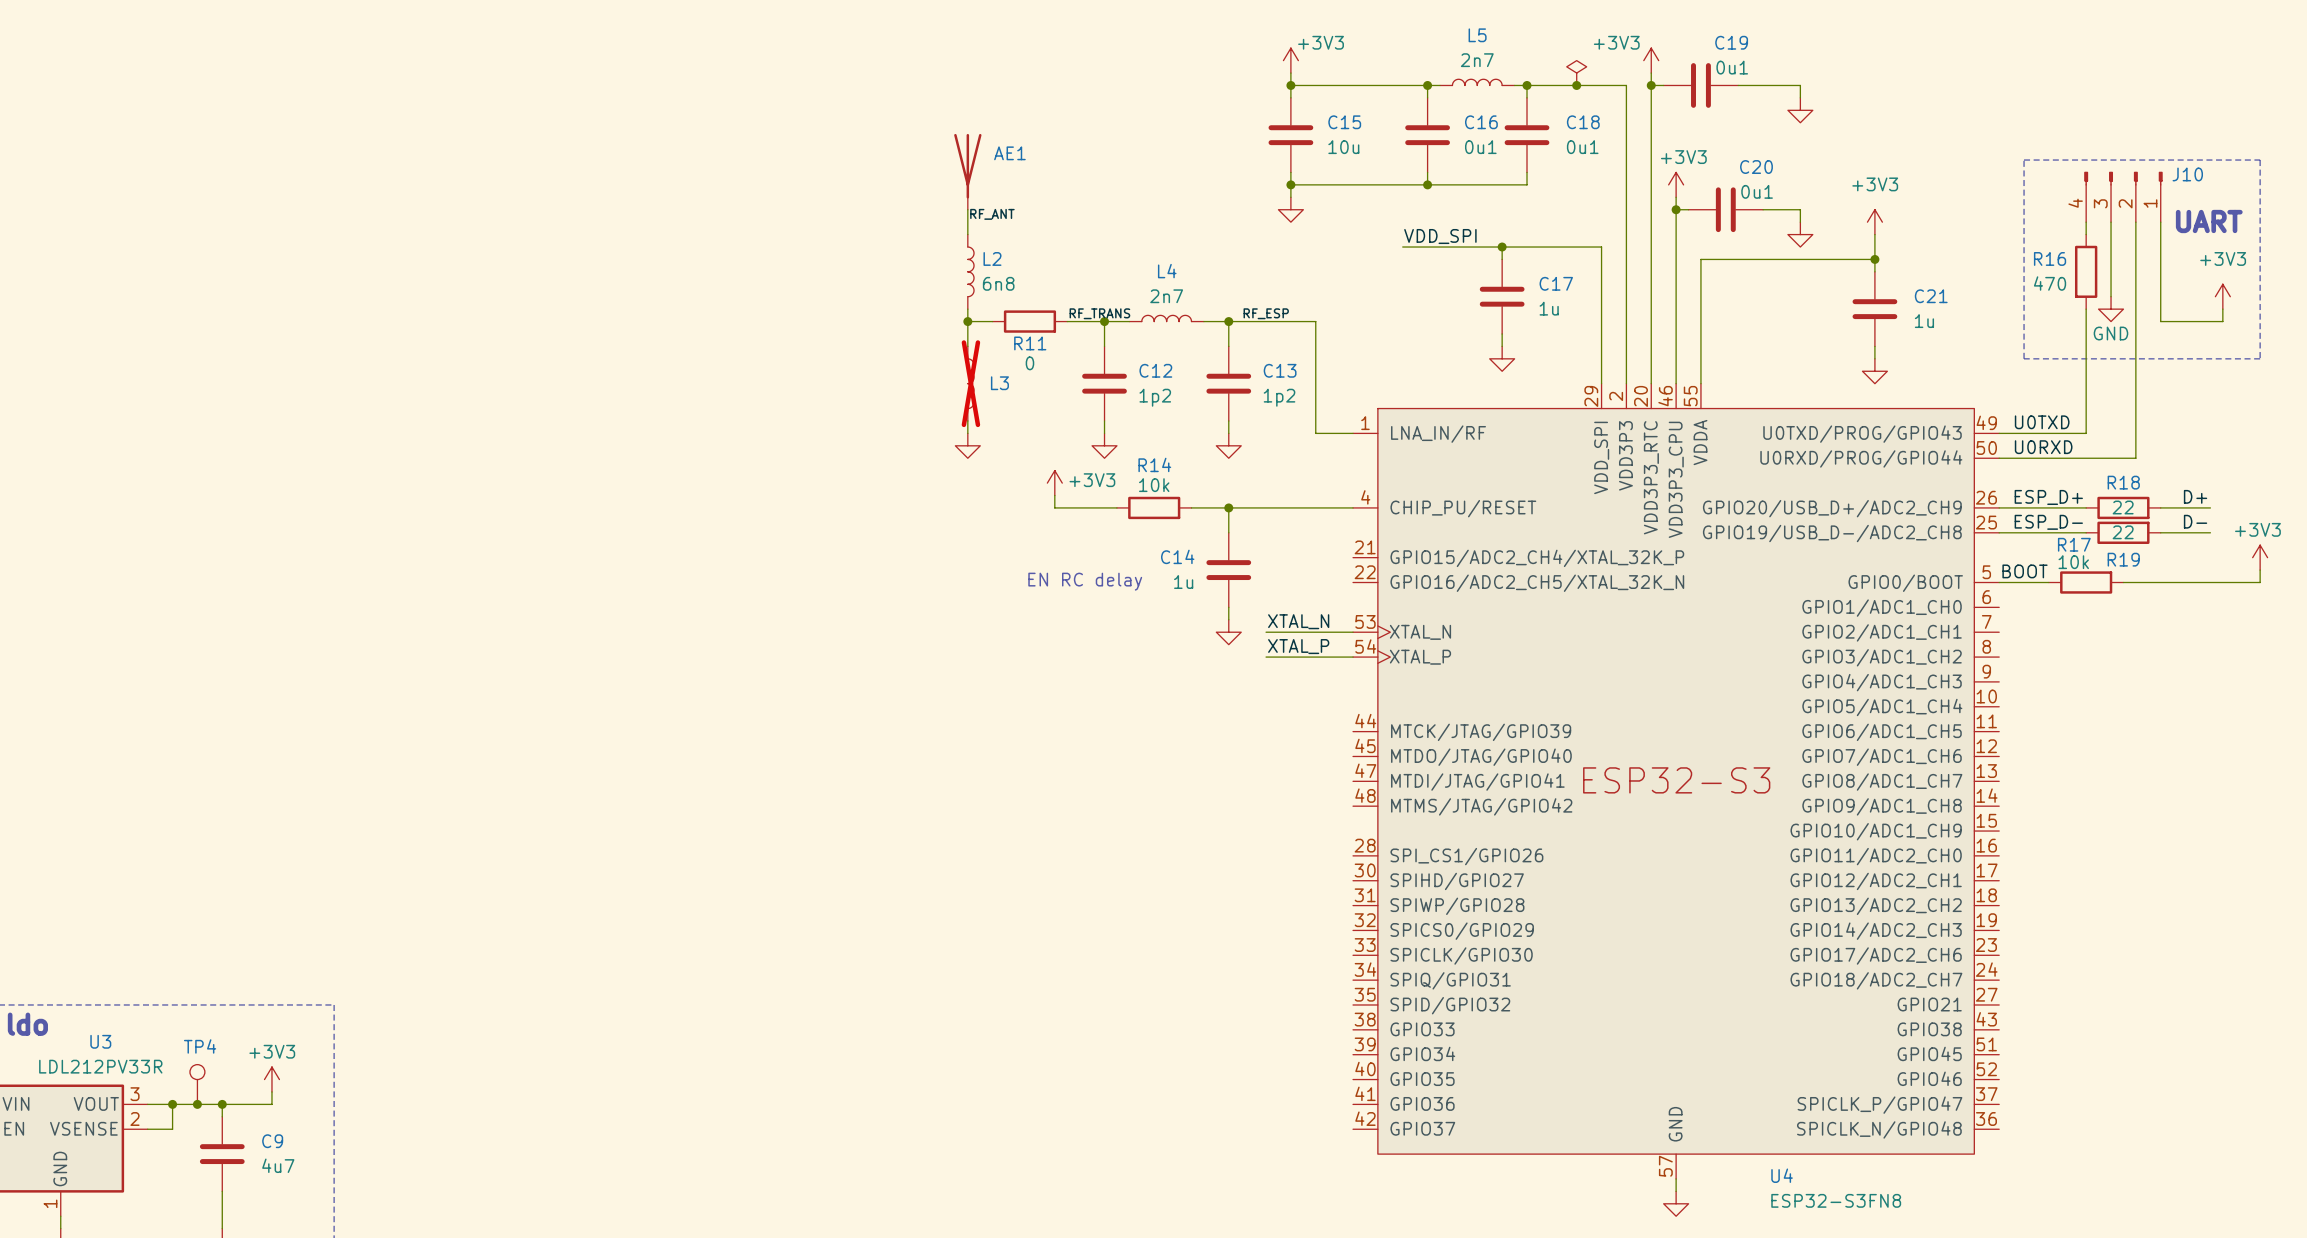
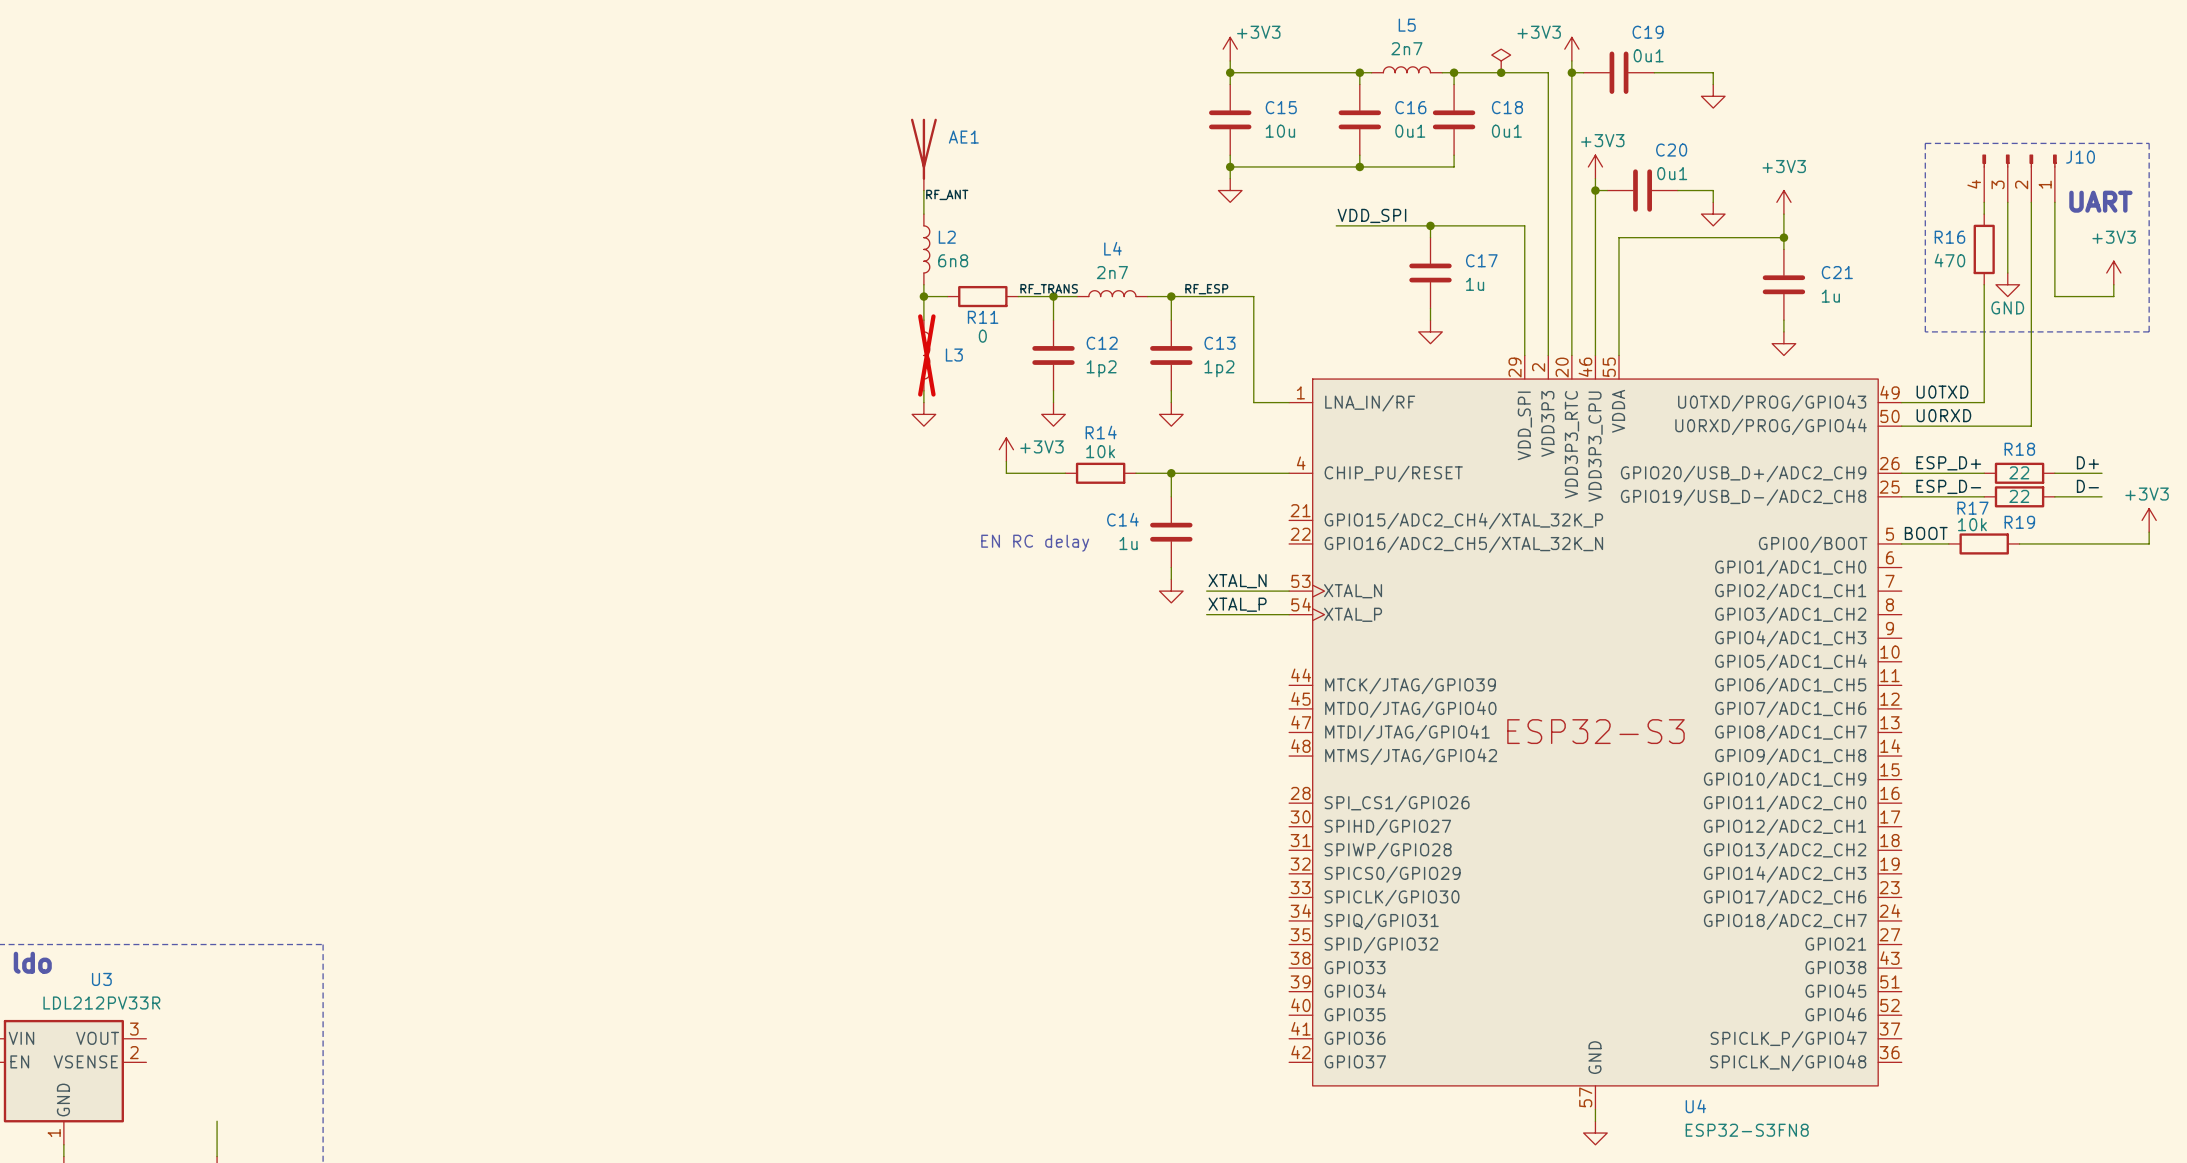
power symbol: +3V3 (271, 1079) -> none
TP4: (197, 1084) -> none
wire: (271, 1091) (271, 1104) (147, 1104) -> none
wire: (172, 1104) (172, 1129) (147, 1129) -> none
junction: (172, 1104) -> none
junction: (197, 1104) -> none
wire: (222, 1104) (222, 1116) -> none
junction: (222, 1104) -> none
C9: 4u7 (222, 1154) -> none

